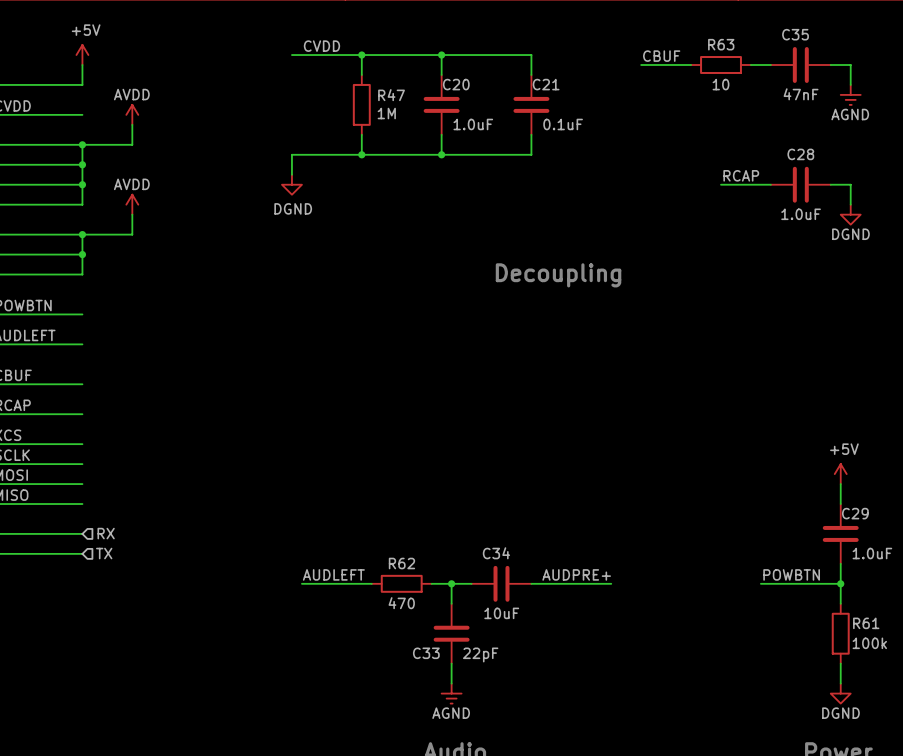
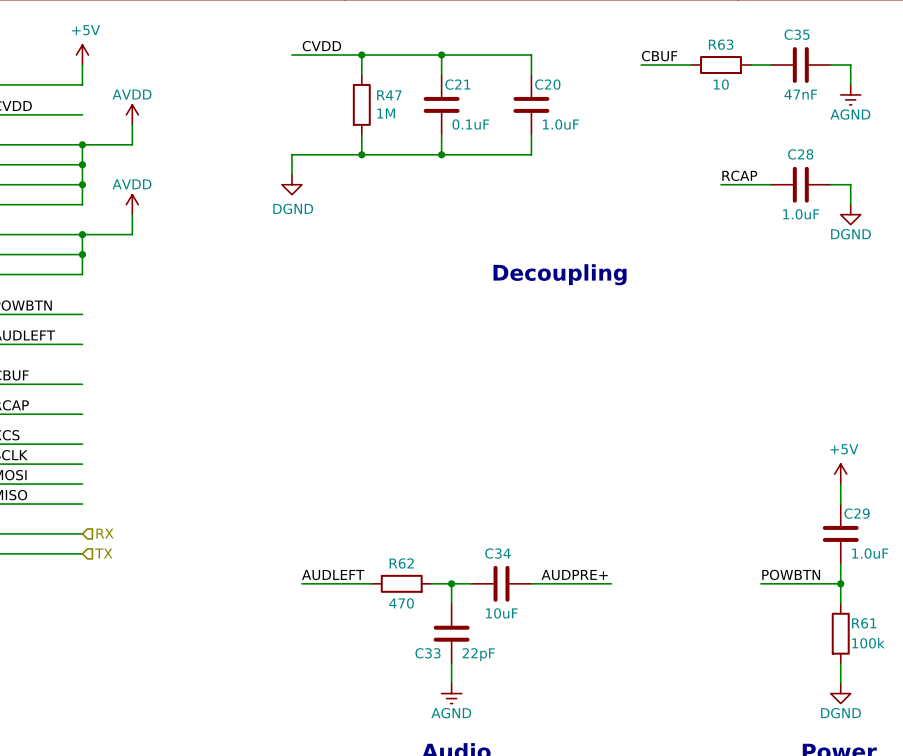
C20 name: C20 (456, 84) -> C21 (457, 84)
C21 name: C21 (546, 84) -> C20 (547, 84)
C20 value: 1.0uF (473, 124) -> 0.1uF (470, 124)
C21 value: 0.1uF (563, 124) -> 1.0uF (560, 124)

